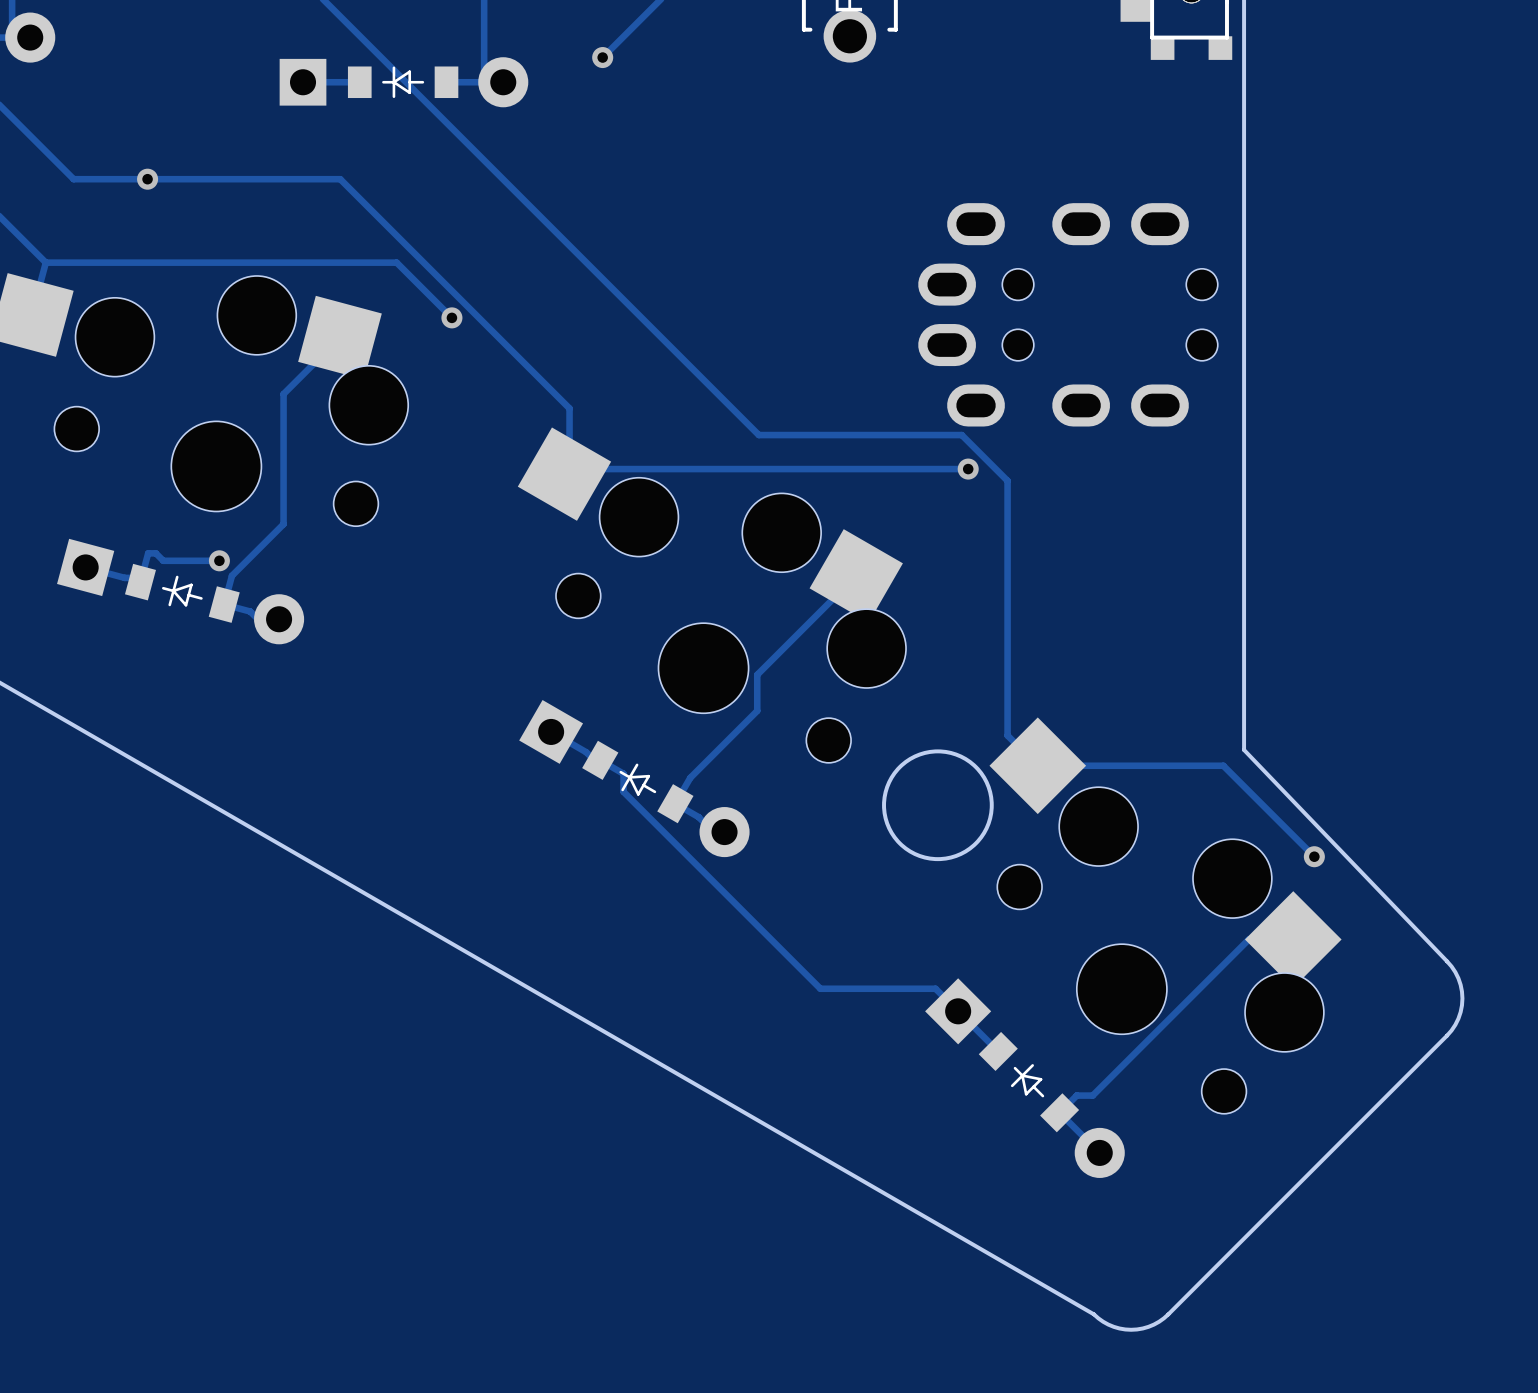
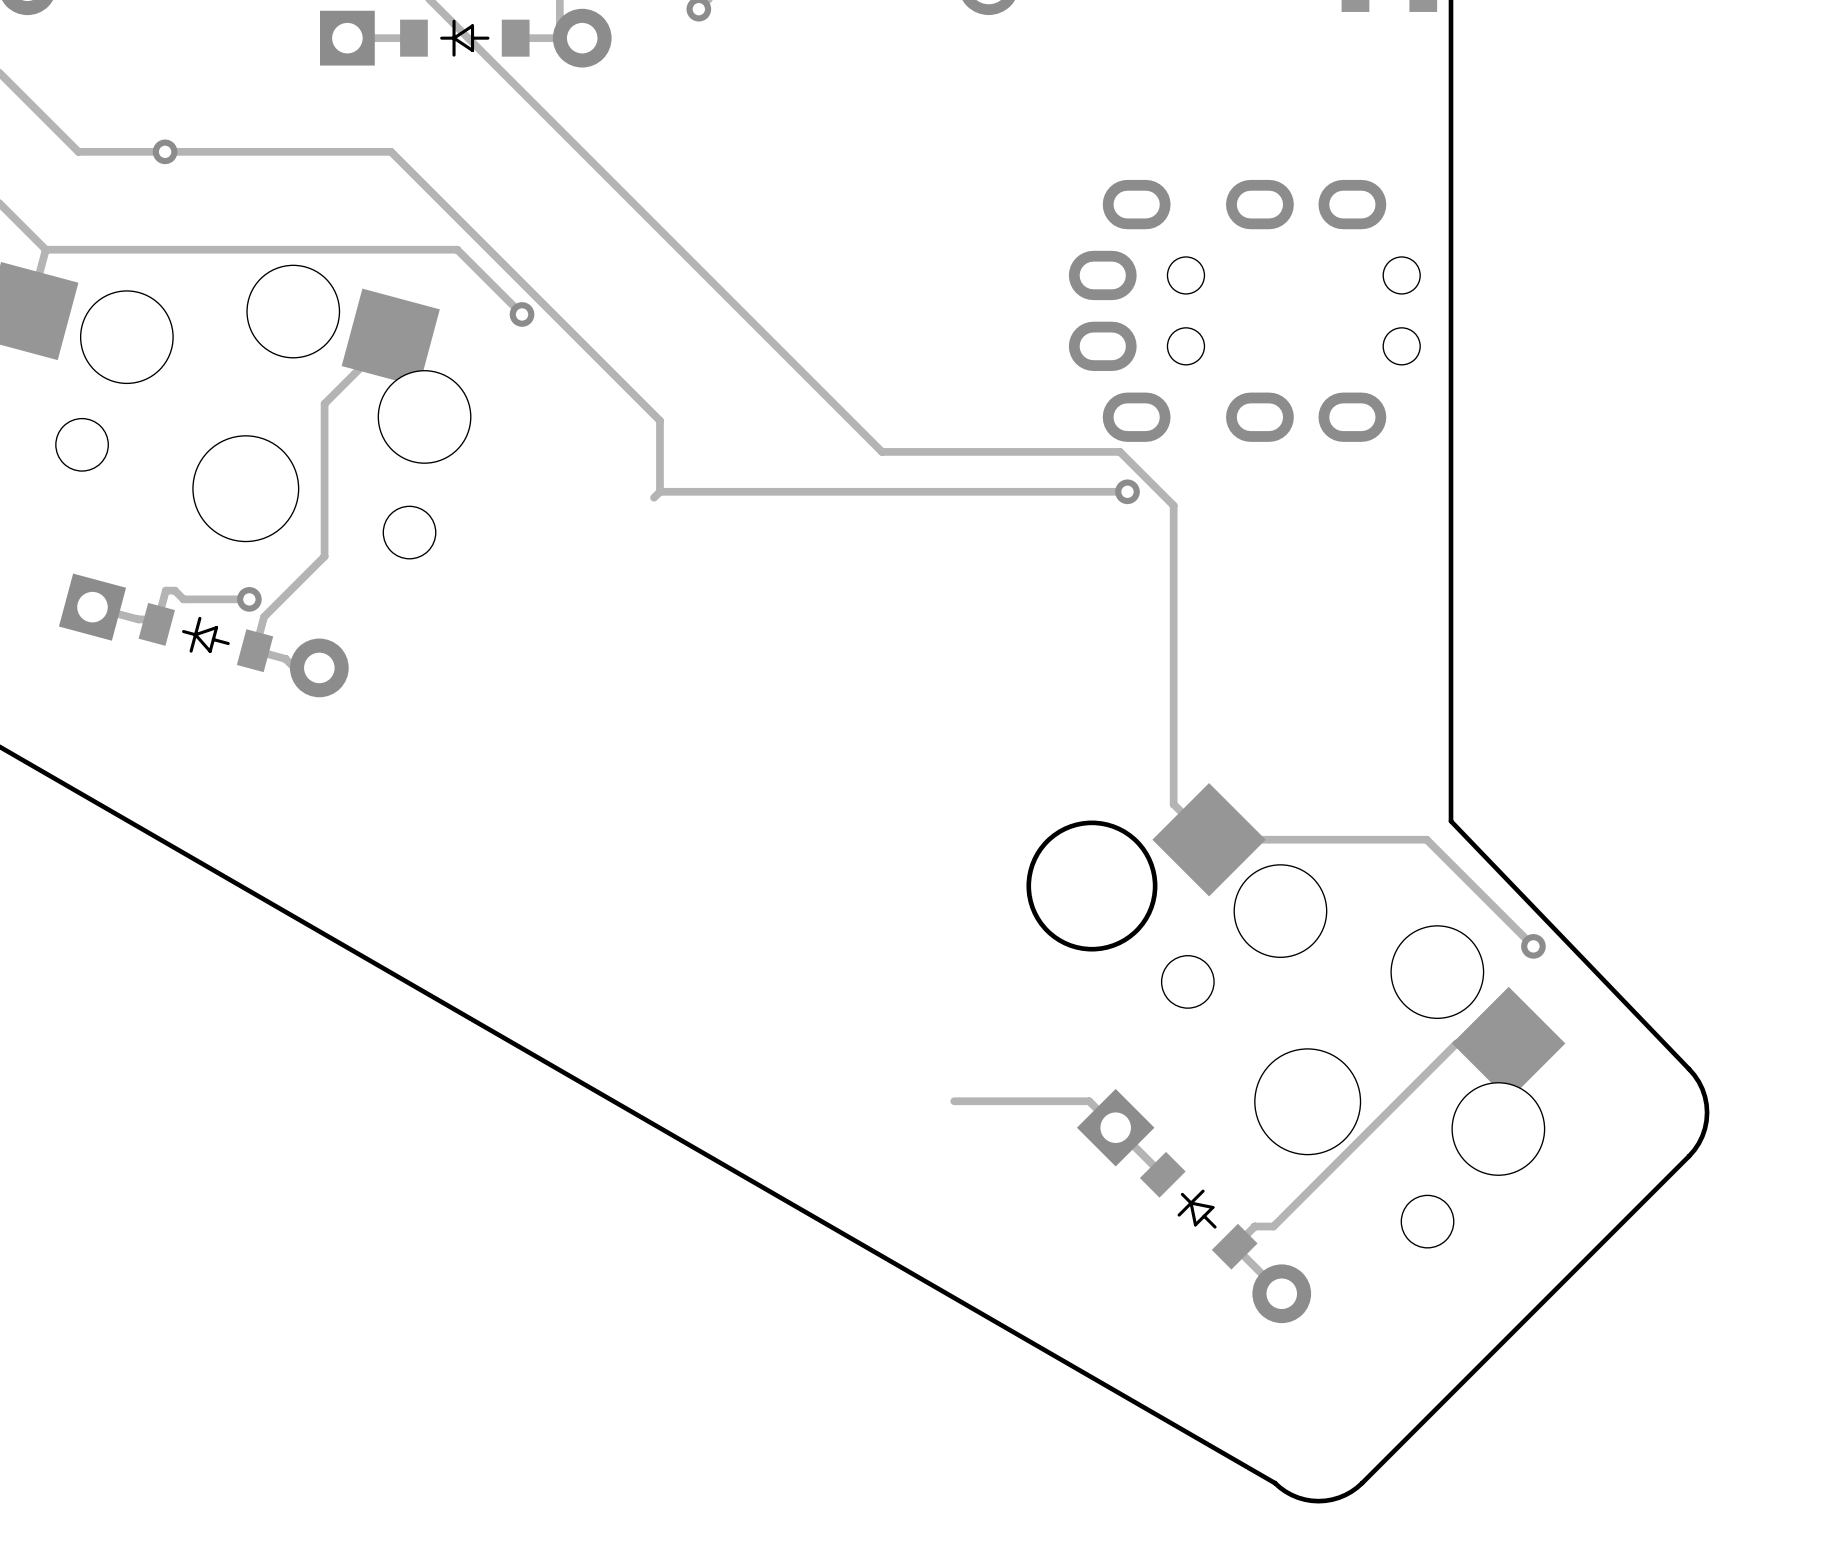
track: (856, 575) (757, 674) (757, 710) (690, 777) (675, 803) (698, 817) (713, 832) (724, 832) -> none
part: (711, 595) -> none
track: (551, 731) (586, 752) (594, 760) (600, 760) (623, 773) (623, 791) (820, 988) -> none
part: (634, 778) -> none

